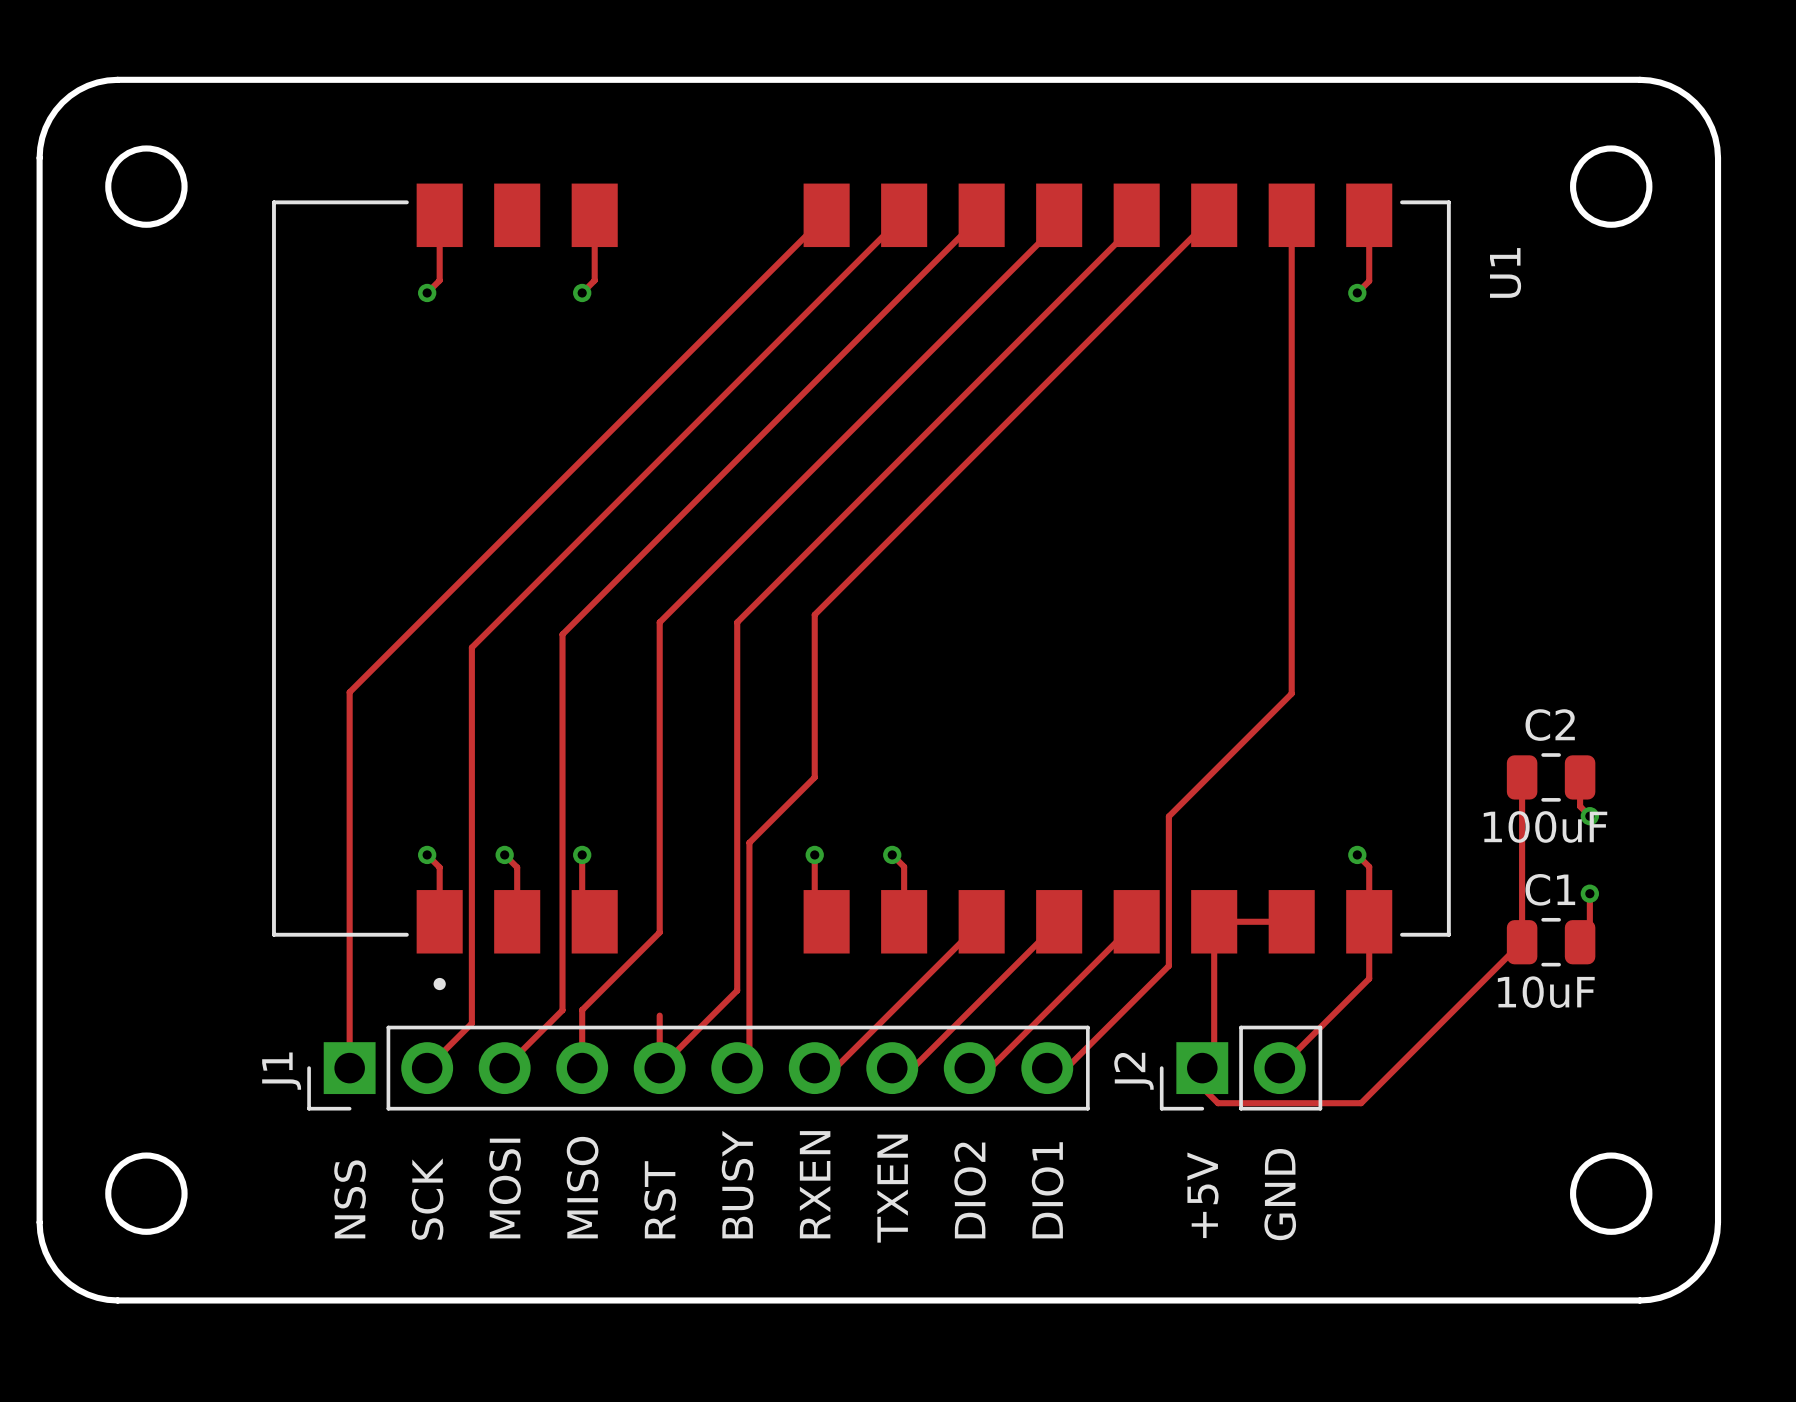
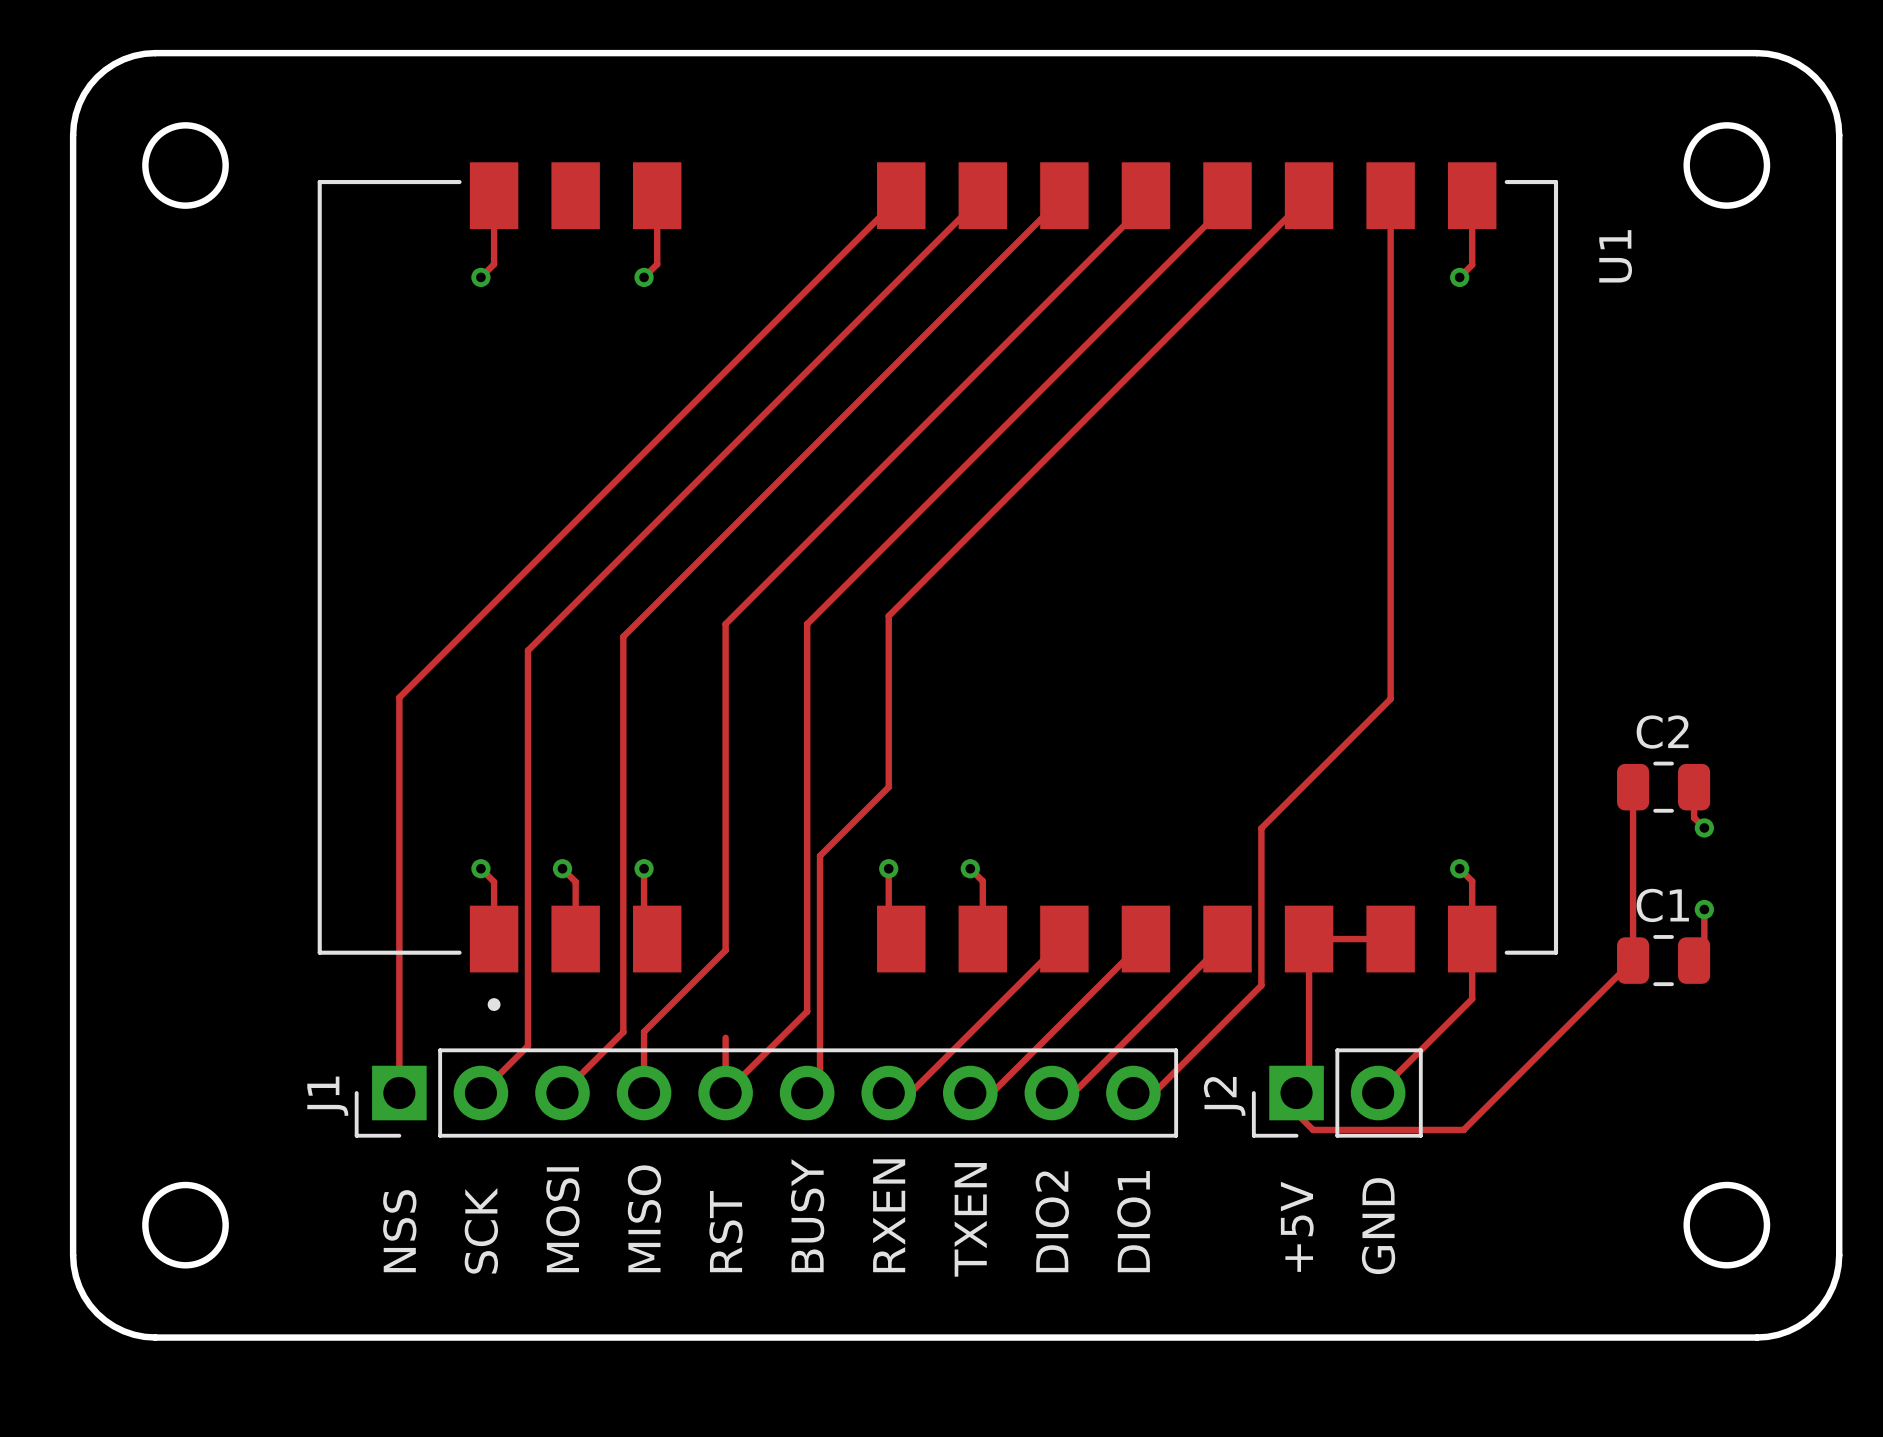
text: 100uF (1545, 826) -> none
text: 10uF (1546, 992) -> none

